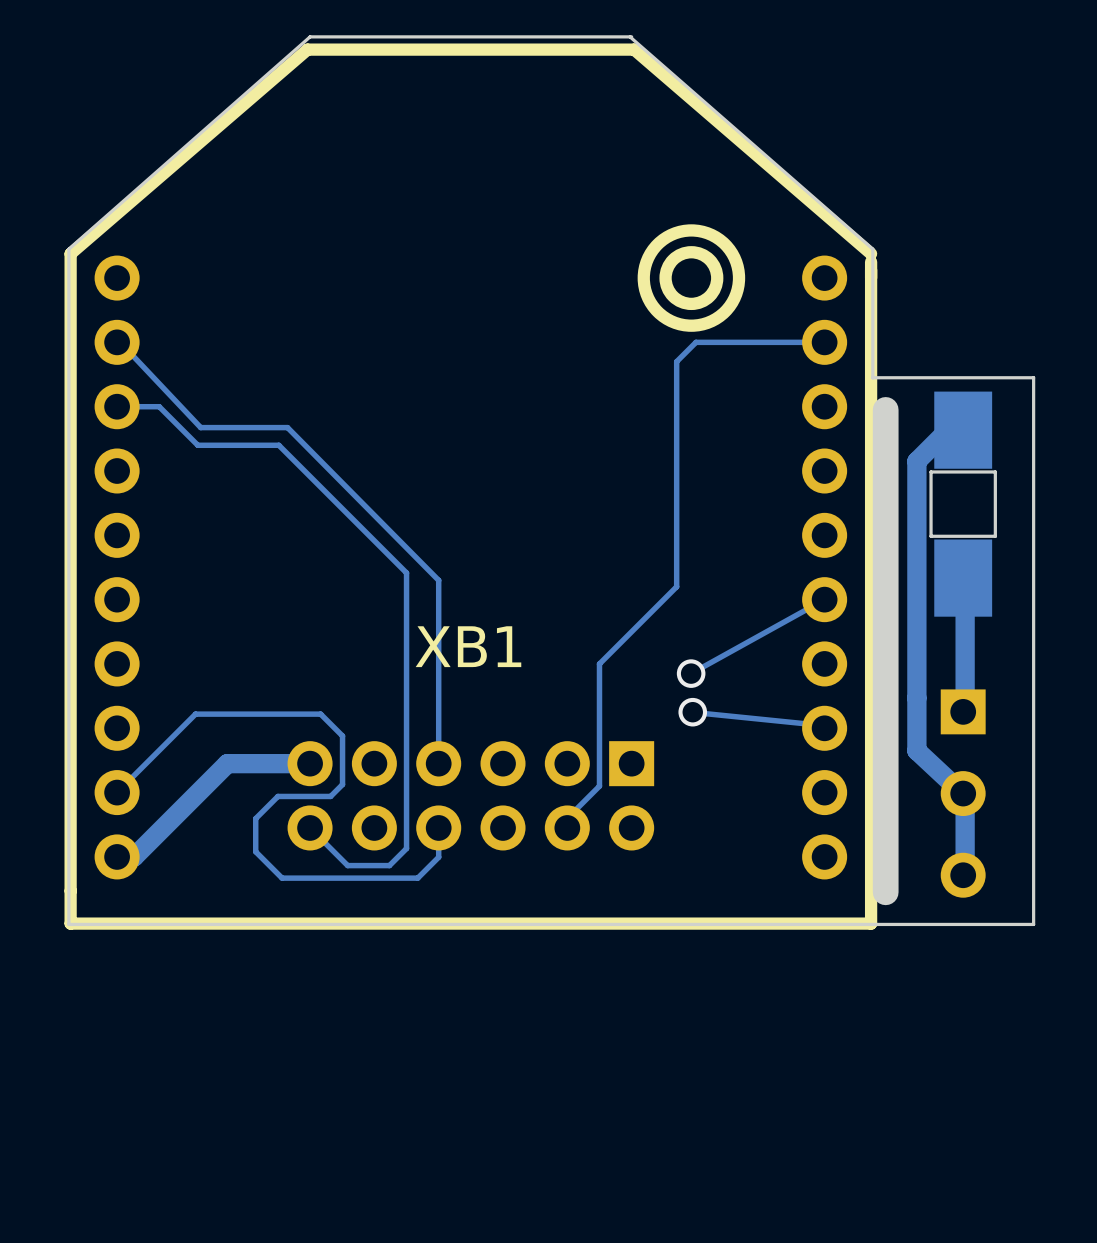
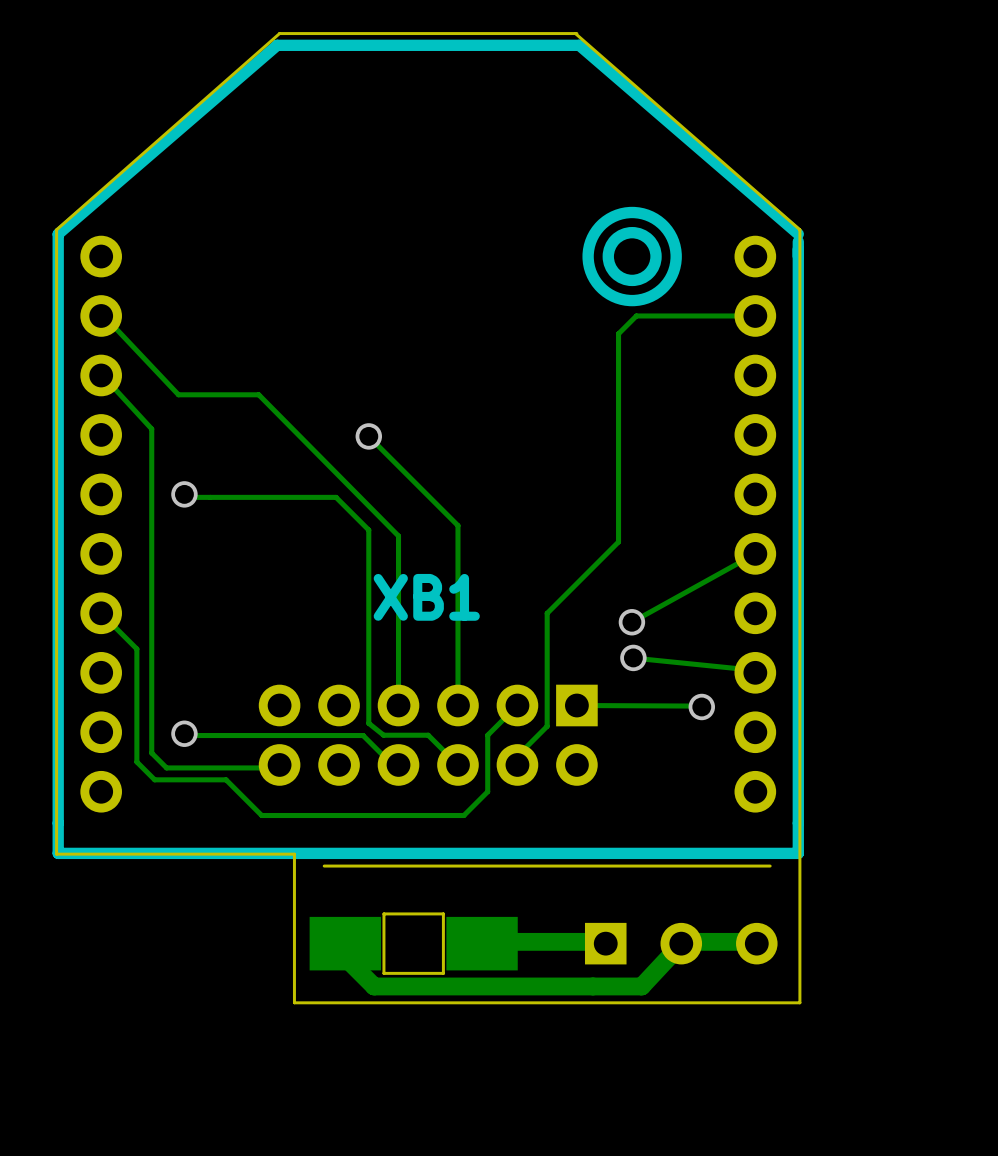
board edge: (872, 377) (1033, 377) (1033, 924) (326, 924) -> (799, 348) (799, 1002) (294, 1002) (294, 854)
track: (117, 406) (159, 406) (197, 445) (278, 445) (406, 573) -> (184, 494) (187, 497) (336, 497) (368, 530)
track: none -> (104, 377) (151, 428) (151, 753) (166, 767) (276, 767)
board edge: (885, 409) (885, 892) -> none
track: (952, 425) (916, 461) (916, 750) (965, 795) (965, 877) -> none
board edge: (995, 471) (931, 471) (931, 536) (995, 536) (995, 471) -> (443, 913) (383, 913) (383, 973) (443, 973) (443, 913)
track: none -> (368, 436) (457, 525) (457, 705)
via: none -> (368, 436)
part rotation: 0° (963, 504) -> 90° clockwise (413, 943)
part position: (963, 504) -> (413, 943)
via: none -> (184, 494)
track: (965, 586) (965, 714) -> none
track: none -> (101, 613) (136, 649) (136, 761) (154, 779) (226, 779) (261, 815) (463, 815) (487, 791) (487, 735) (517, 705)
track: (310, 763) (227, 763) (134, 856) (117, 856) -> none
track: none -> (576, 705) (701, 706)
via: none -> (701, 706)
track: (406, 782) (406, 848) (389, 865) (347, 865) (310, 827) -> (368, 723) (383, 735) (428, 735) (457, 764)
track: (117, 792) (195, 714) (320, 714) (342, 736) (342, 784) (330, 796) (277, 796) (255, 818) (255, 851) (282, 878) (417, 878) (438, 857) (438, 847) -> none
part rotation: 0° (963, 793) -> 90° counterclockwise (681, 943)
part position: (963, 793) -> (681, 943)
track: none -> (184, 733) (186, 735) (363, 735) (392, 764)
via: none -> (184, 733)
board edge: none -> (770, 866) (324, 866)
track: none -> (607, 941) (490, 941)
track: none -> (758, 941) (683, 941) (641, 986) (374, 986) (341, 953)

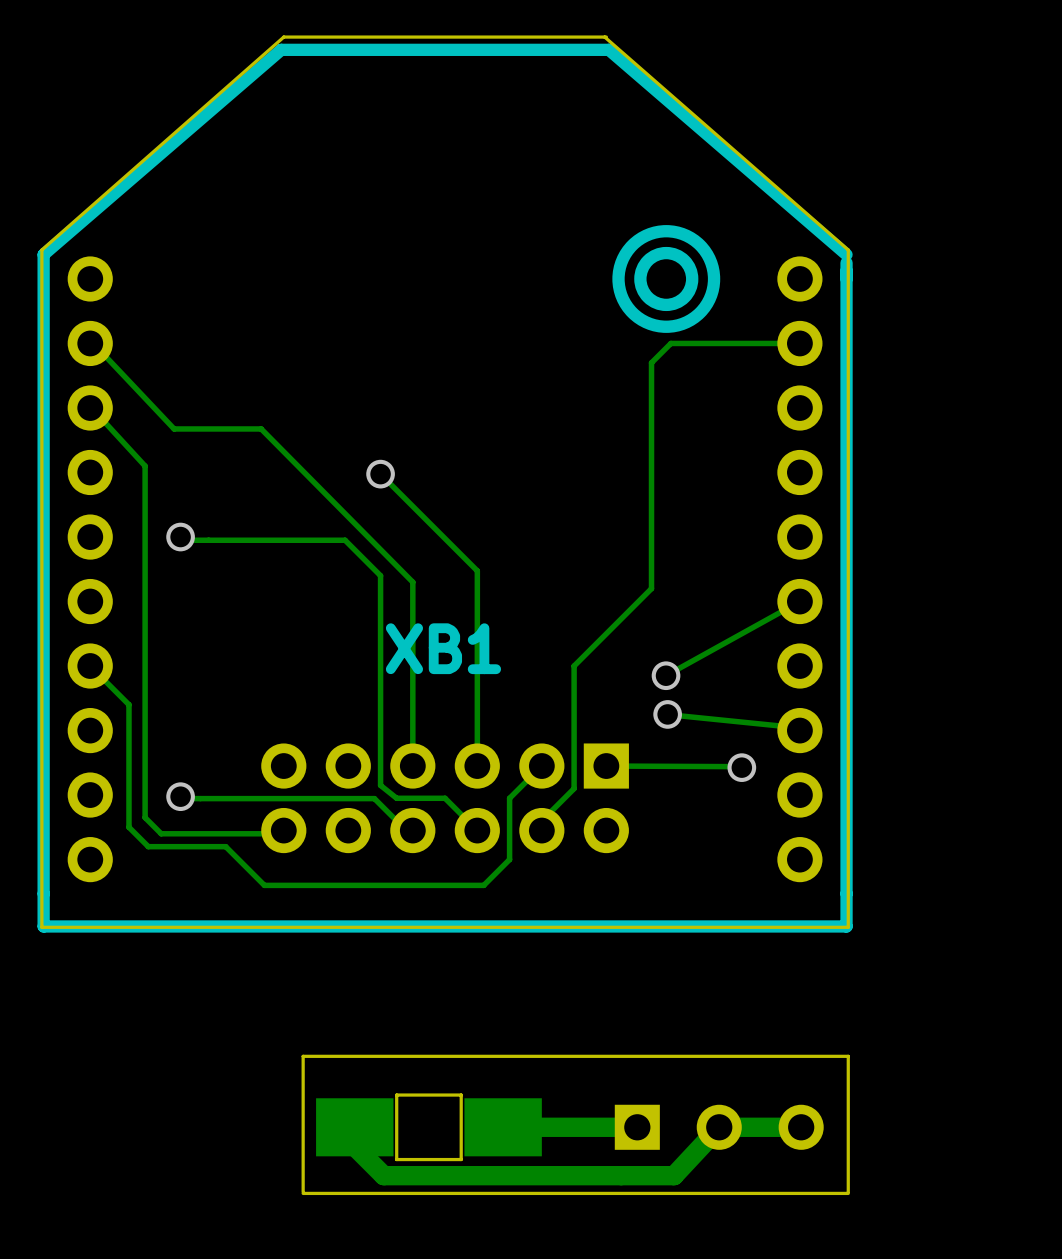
board edge: (294, 854) (294, 1002) (799, 1002) -> (299, 927) (848, 927)
board edge: (799, 854) (799, 973) -> (303, 1191) (303, 1056) (848, 1056)
board edge: (770, 866) (324, 866) -> none
board edge: (443, 913) (443, 973) (383, 973) (383, 913) (443, 913) -> (461, 1095) (461, 1159) (396, 1159) (396, 1095) (461, 1095)
track: (607, 941) (490, 941) -> (637, 1127) (509, 1127)
track: (758, 941) (683, 941) (641, 986) (374, 986) (341, 953) -> none
part position: (413, 943) -> (428, 1127)
part: (681, 943) -> none
board edge: none -> (848, 1088) (848, 1191)
part: none -> (719, 1127)
track: none -> (801, 1127) (719, 1127) (674, 1175) (383, 1175) (348, 1140) (348, 1127)
board edge: none -> (848, 1193) (303, 1193)

